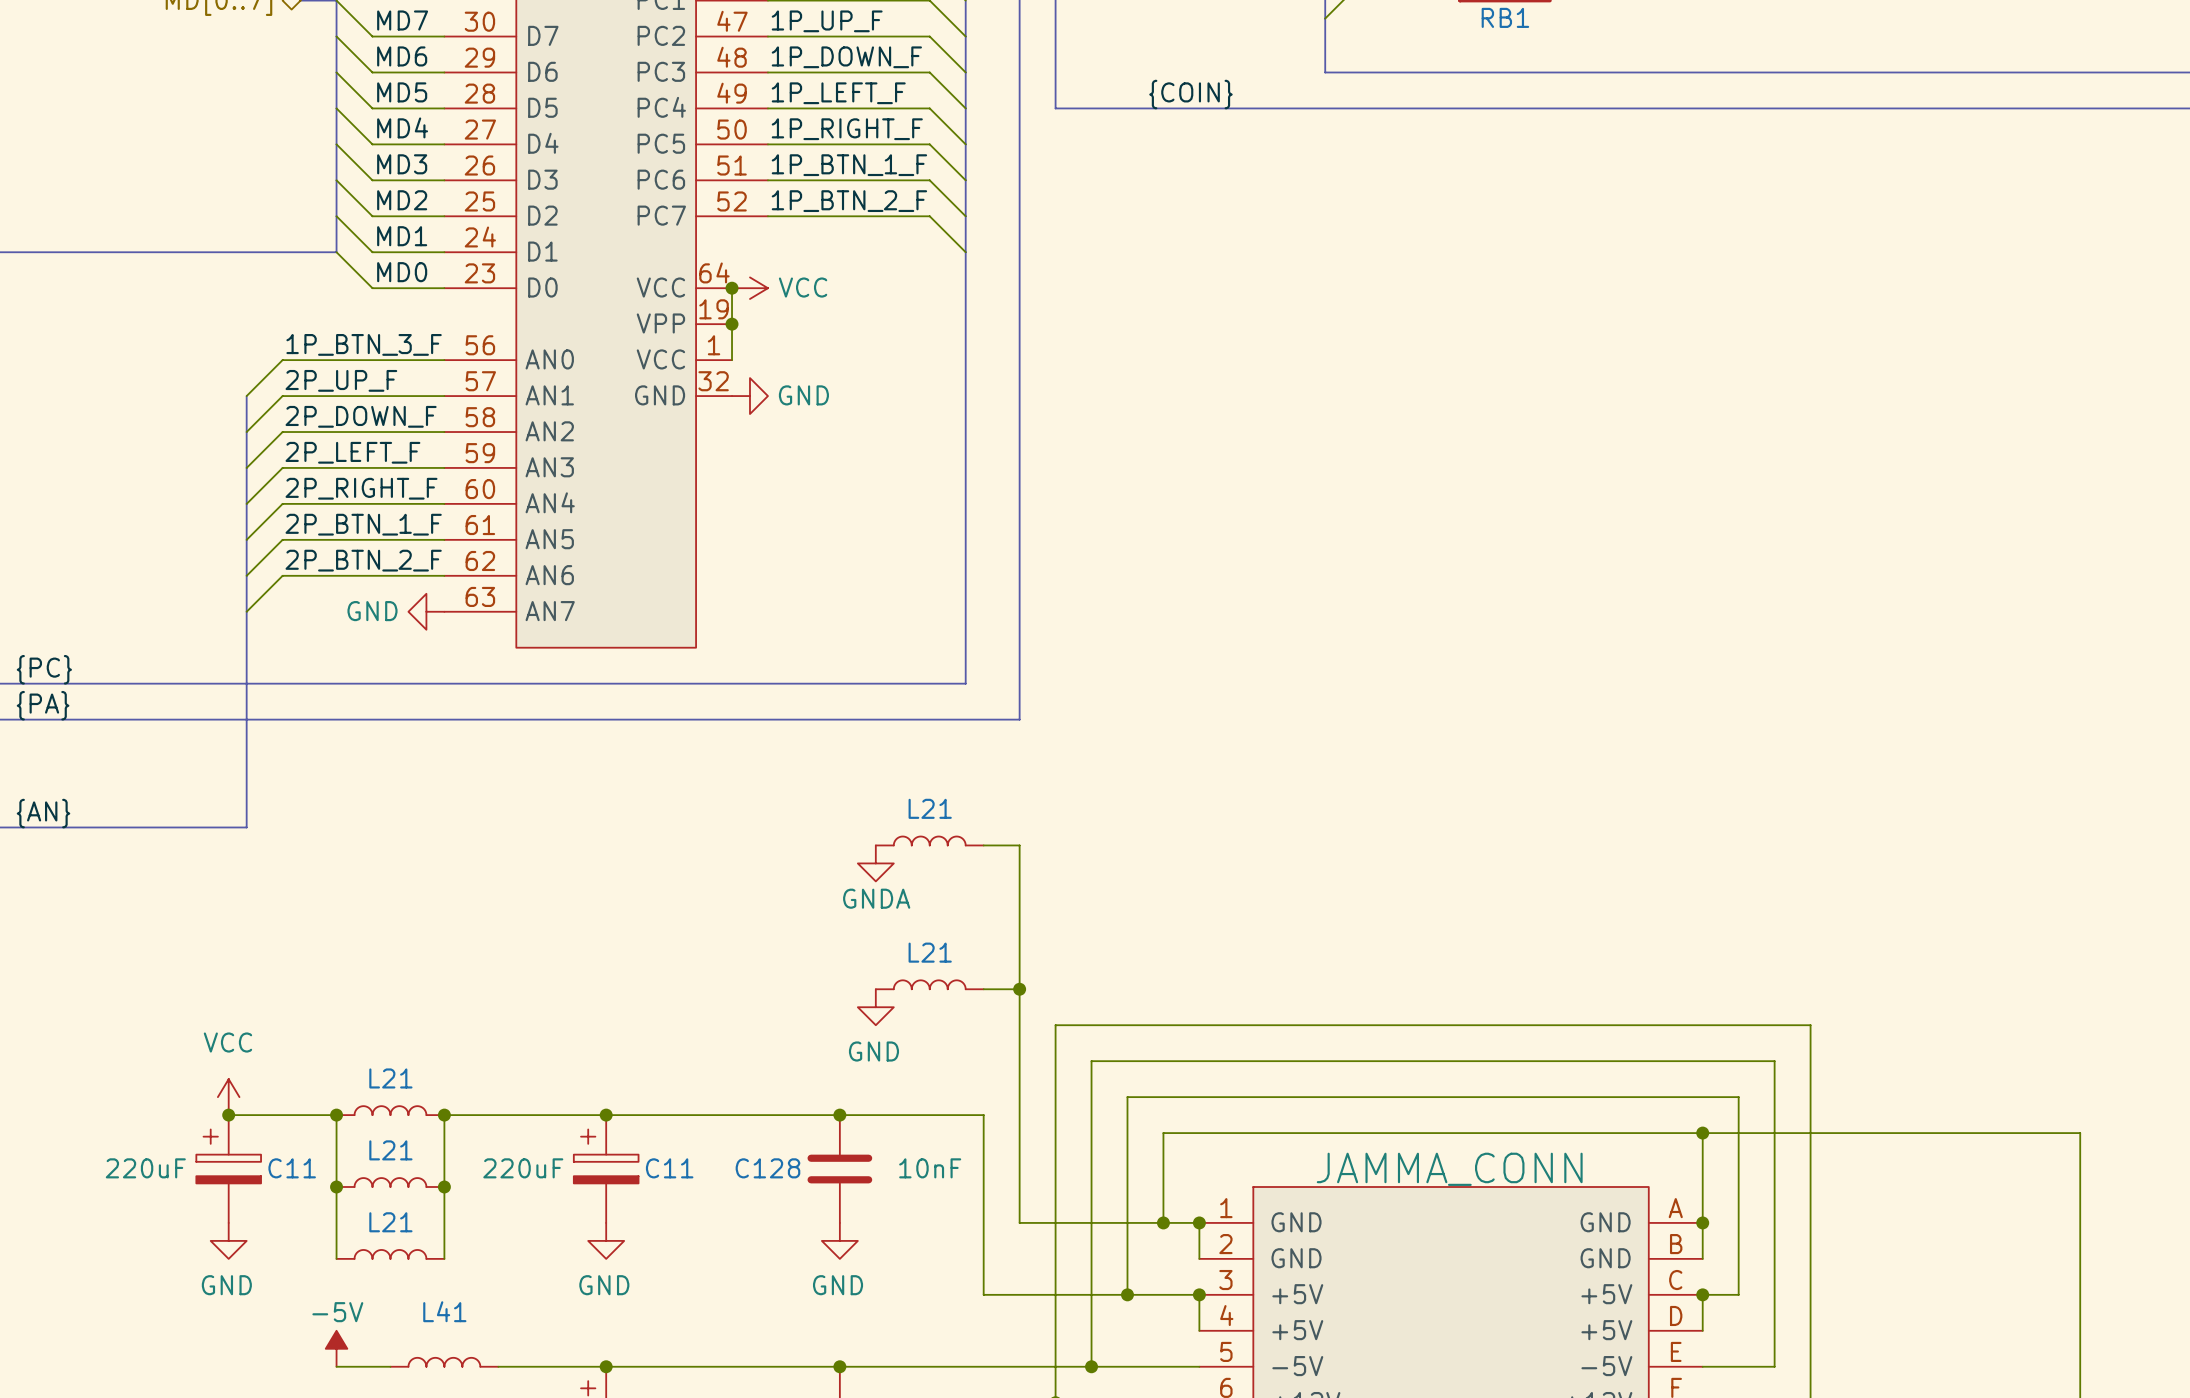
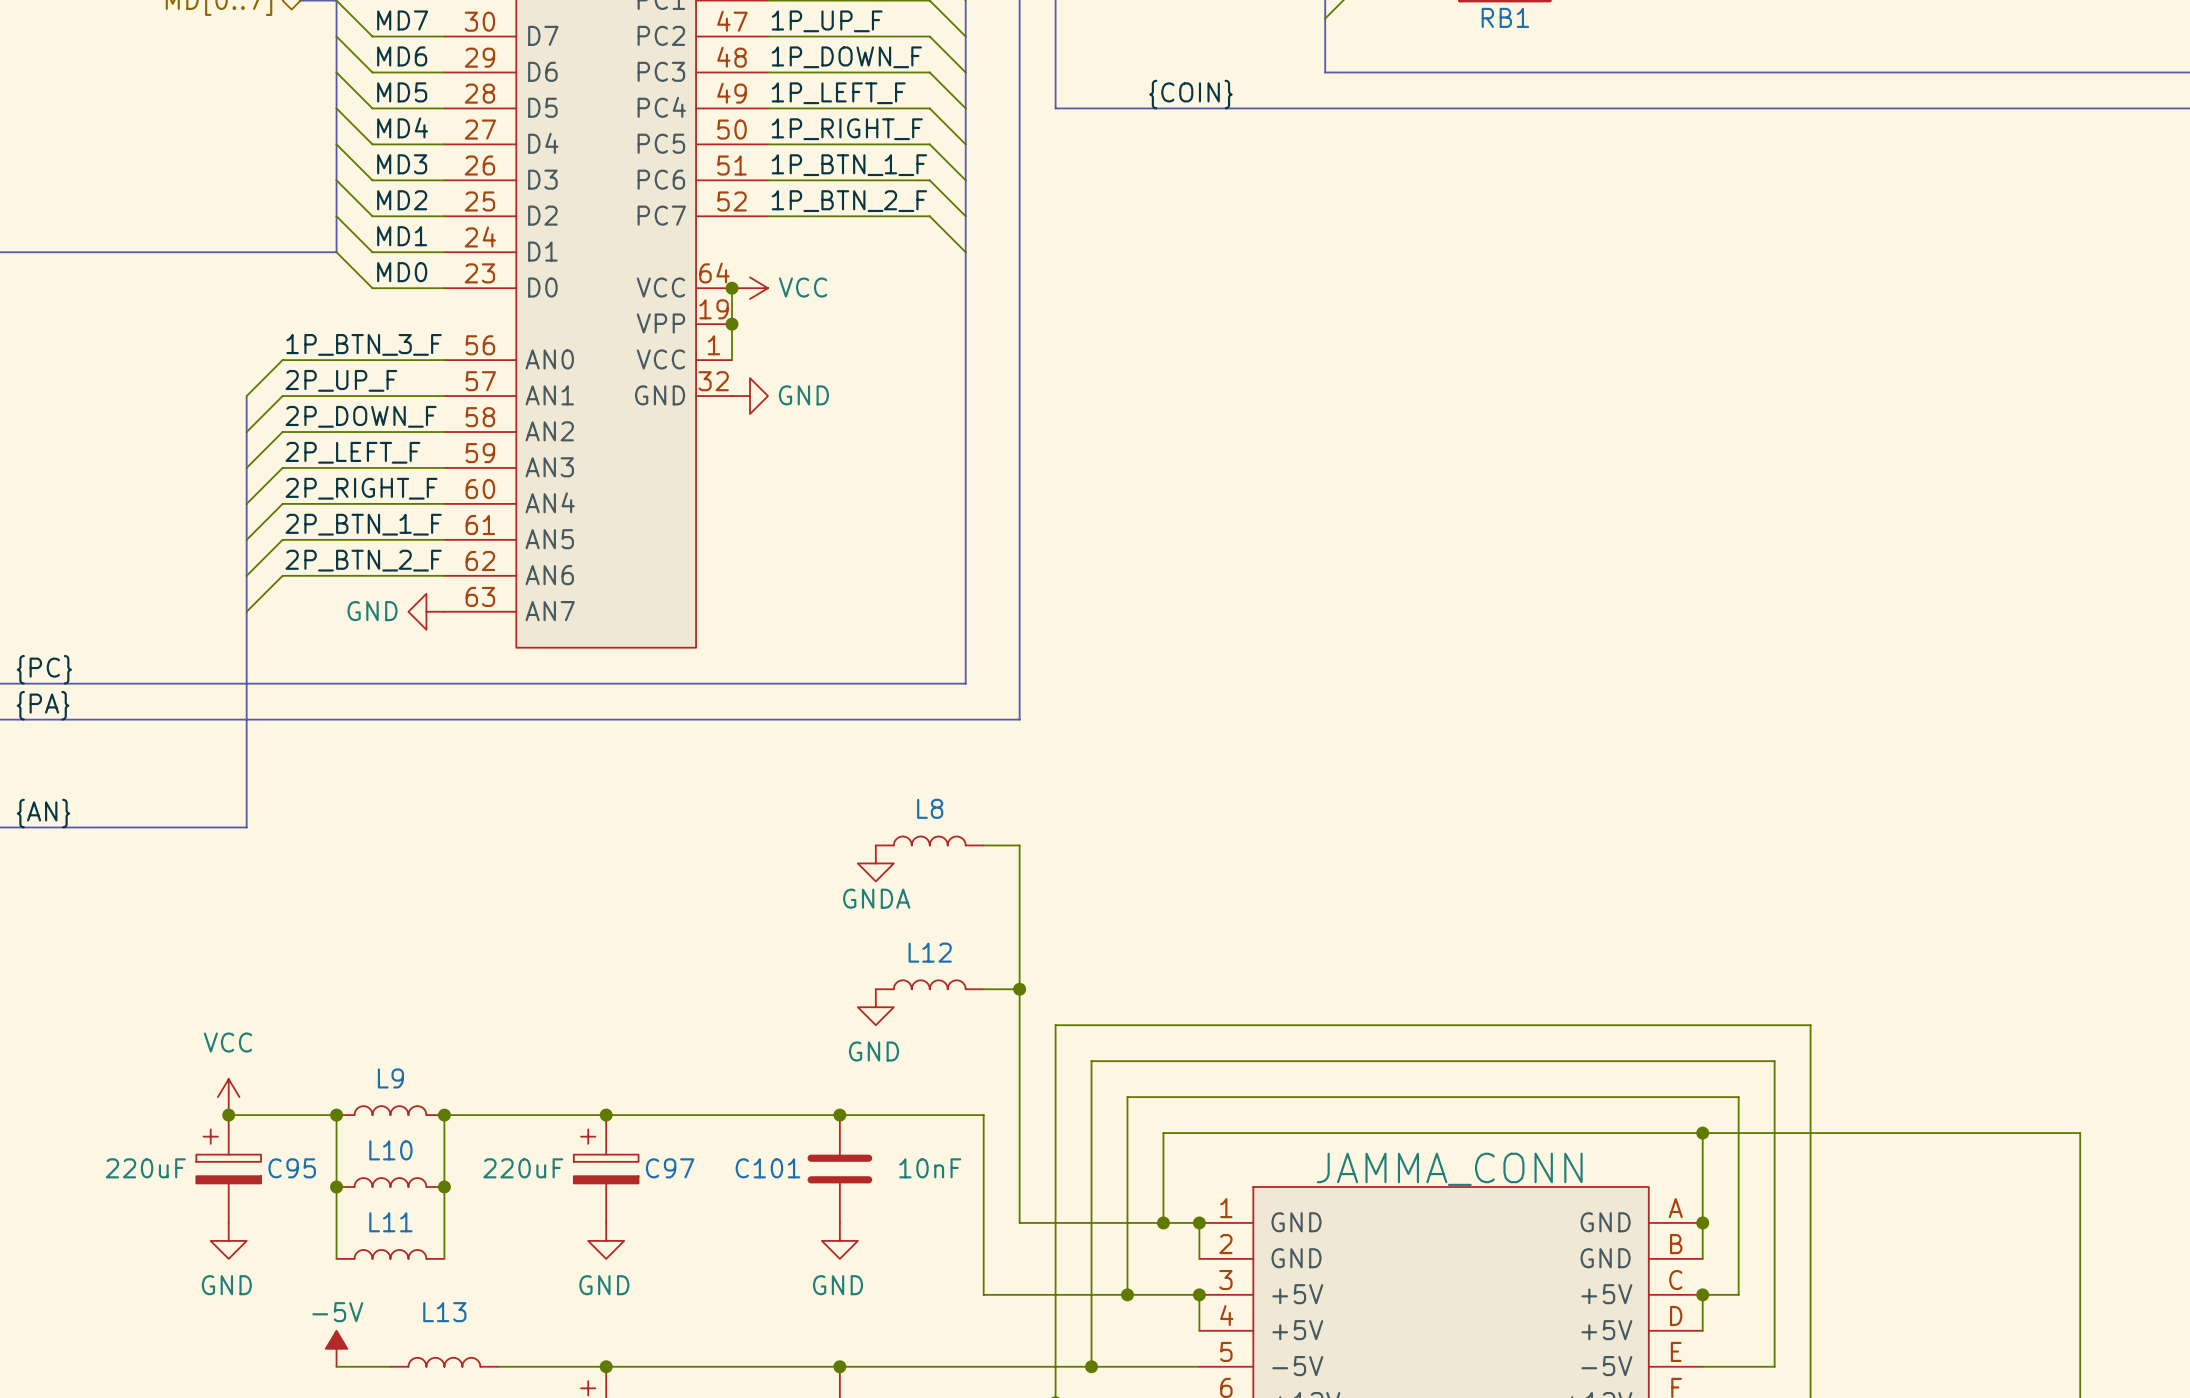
L21 name: L21 (930, 808) -> L8 (930, 808)
L21 name: L21 (930, 952) -> L12 (930, 952)
L21 name: L21 (390, 1078) -> L9 (390, 1078)
L21 name: L21 (390, 1150) -> L10 (390, 1150)
C11 name: C11 (292, 1168) -> C95 (292, 1168)
C11 name: C11 (669, 1168) -> C97 (670, 1168)
C128 name: C128 (767, 1168) -> C101 (767, 1168)
L21 name: L21 (390, 1222) -> L11 (390, 1222)
L41 name: L41 (444, 1311) -> L13 (444, 1312)

